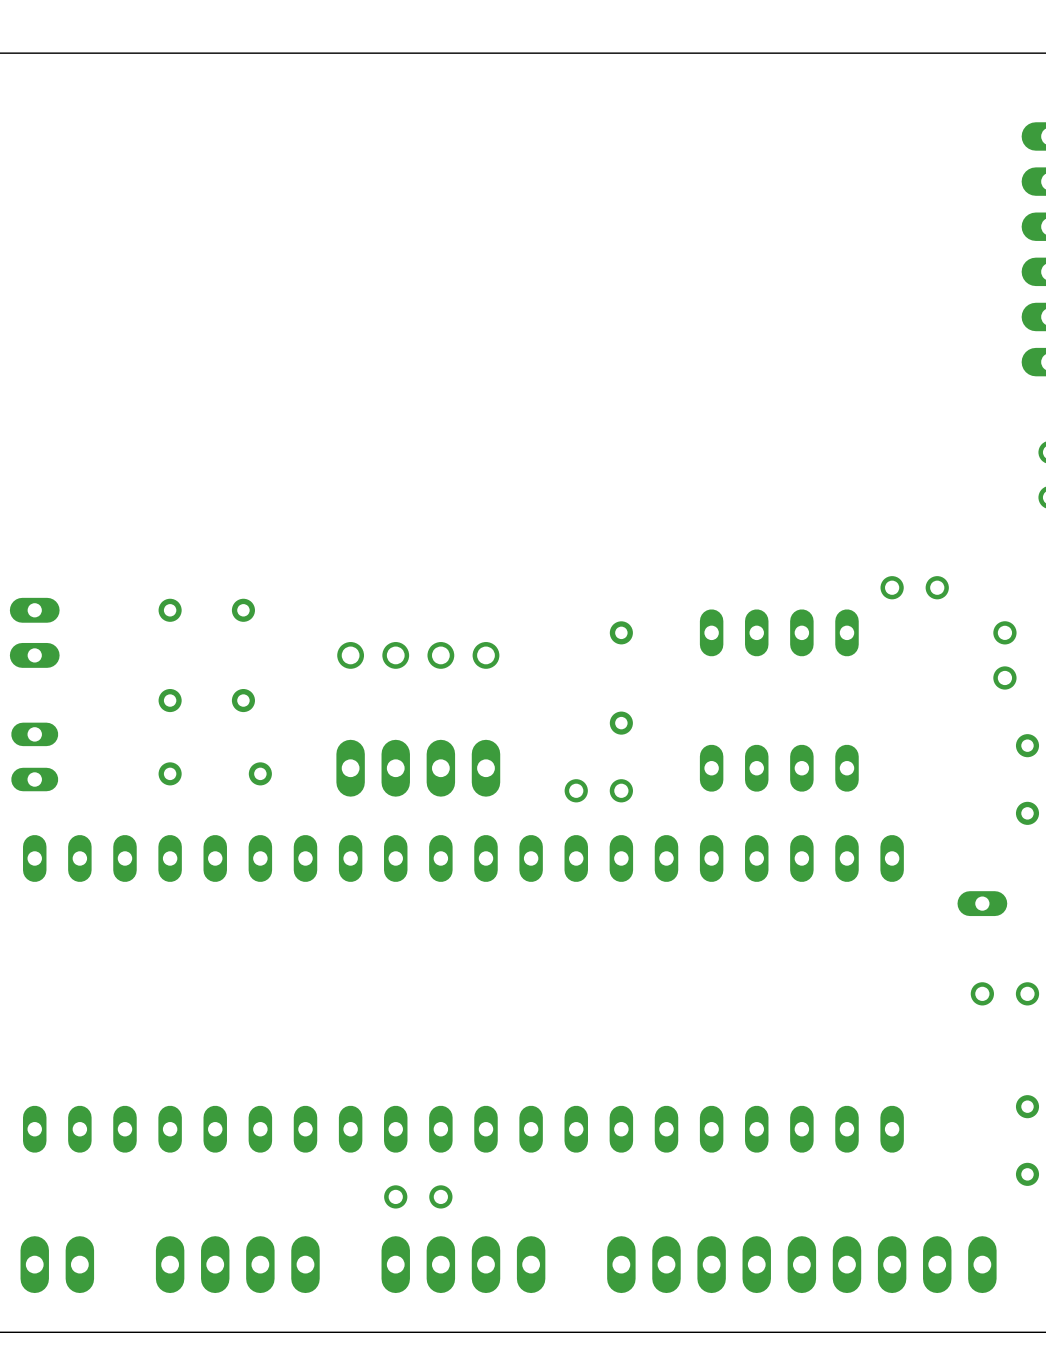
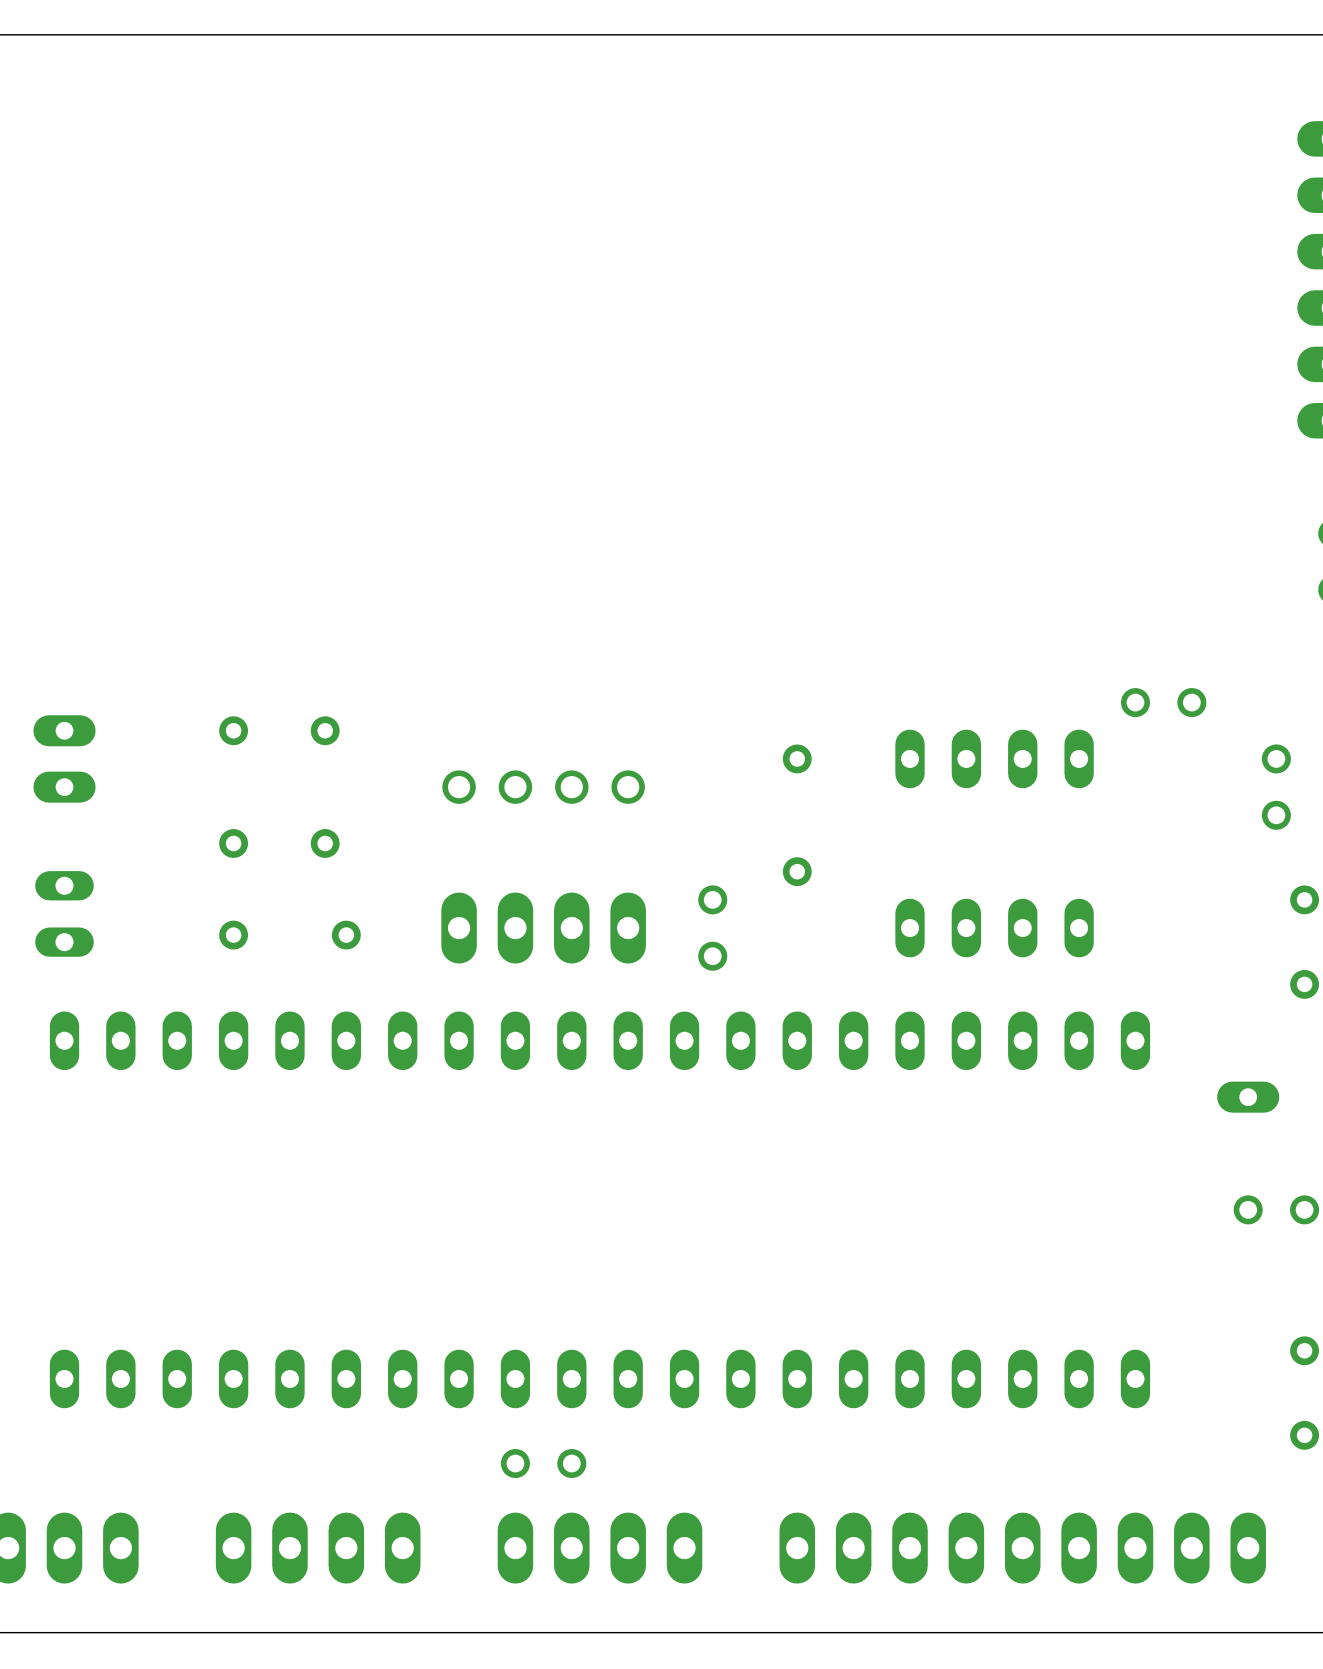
part rotation: 0° (598, 790) -> 90° clockwise (712, 928)
part position: (598, 790) -> (712, 928)

